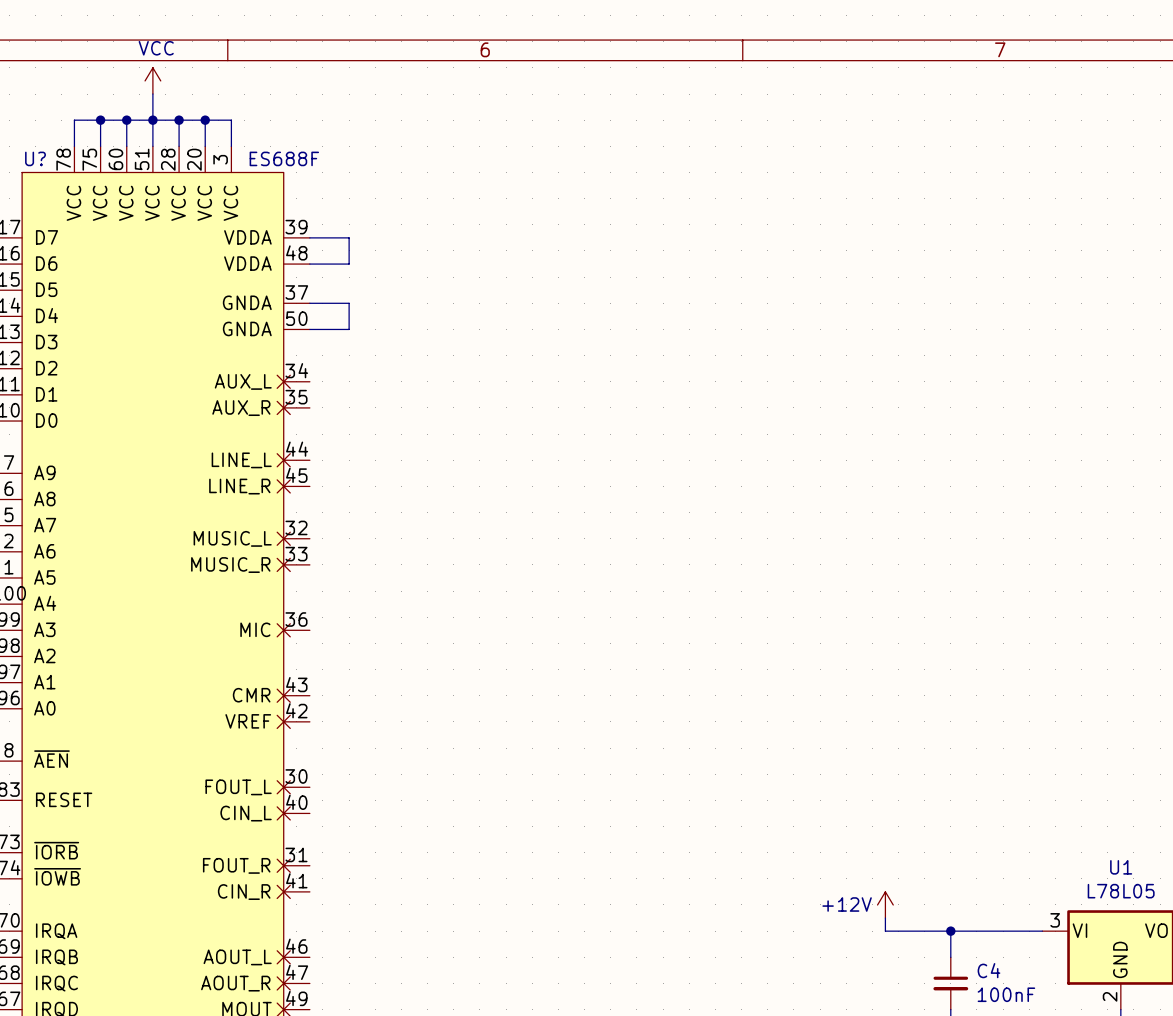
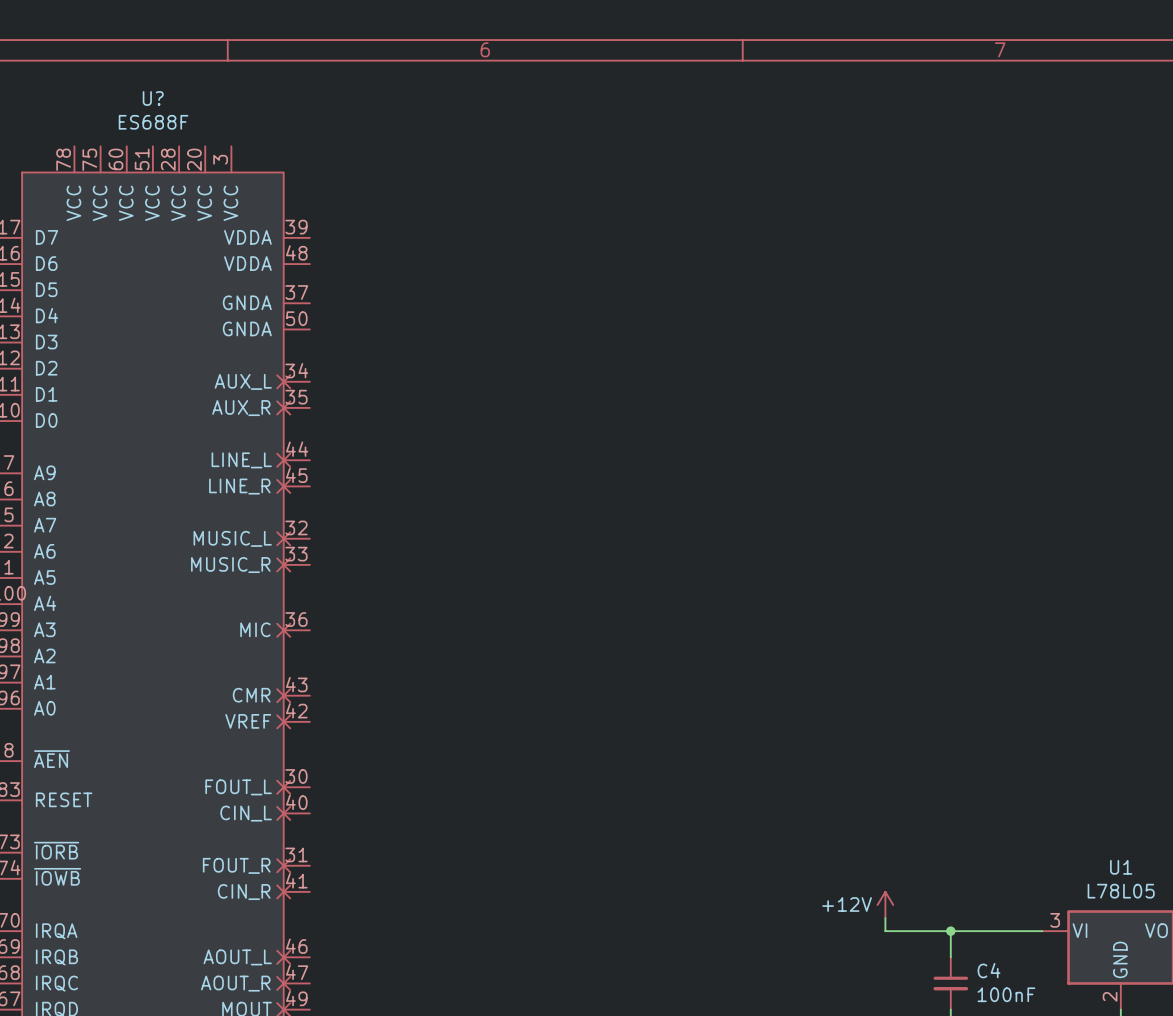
power symbol: VCC (152, 80) -> none
wire: (152, 94) (152, 146) -> none
wire: (100, 120) (100, 146) -> none
junction: (100, 120) -> none
wire: (126, 120) (126, 146) -> none
junction: (126, 120) -> none
junction: (152, 120) -> none
wire: (179, 120) (179, 146) -> none
junction: (179, 120) -> none
wire: (205, 120) (205, 146) -> none
junction: (205, 120) -> none
wire: (74, 146) (74, 120) (231, 120) (231, 146) -> none
U? name position: U? (35, 158) -> U? (153, 98)
U? value position: ES688F (284, 158) -> ES688F (153, 122)
wire: (309, 237) (349, 237) (349, 264) (309, 264) -> none
wire: (309, 303) (349, 303) (349, 329) (309, 329) -> none

